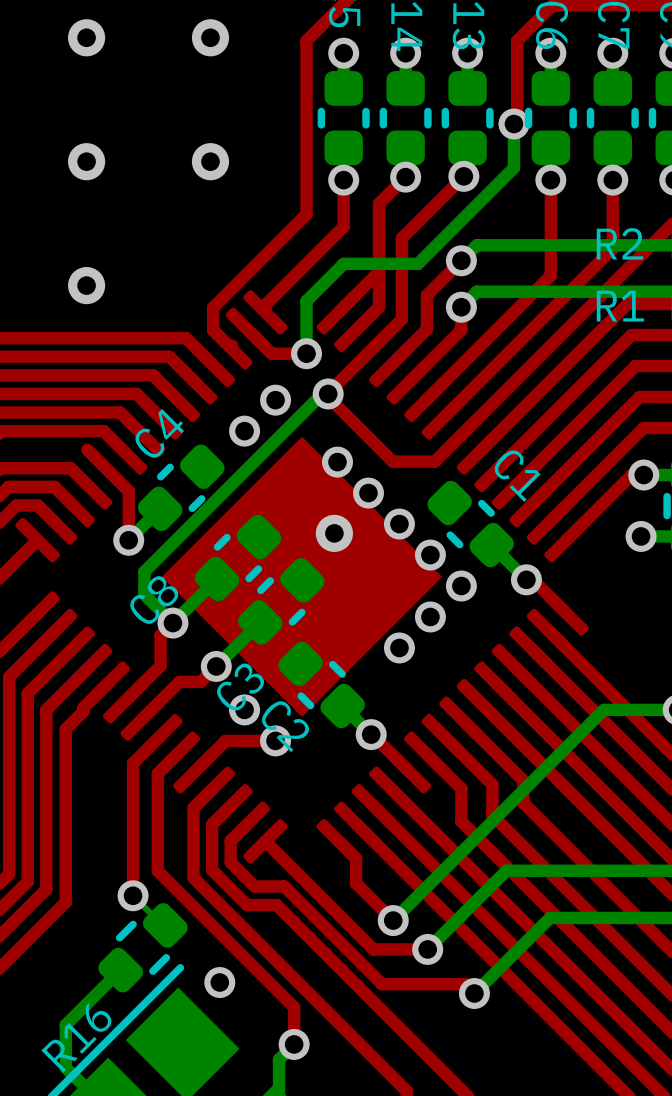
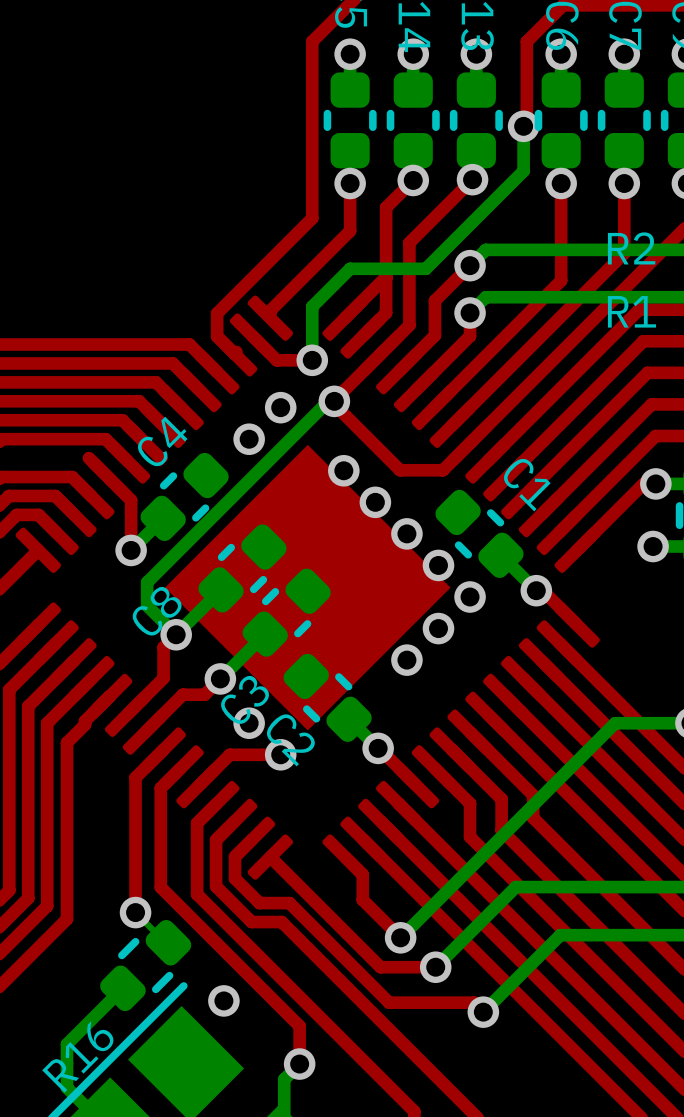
via: (86, 37) -> none
via: (210, 37) -> none
via: (86, 161) -> none
via: (210, 161) -> none
via: (86, 285) -> none
via: (334, 533) -> none

